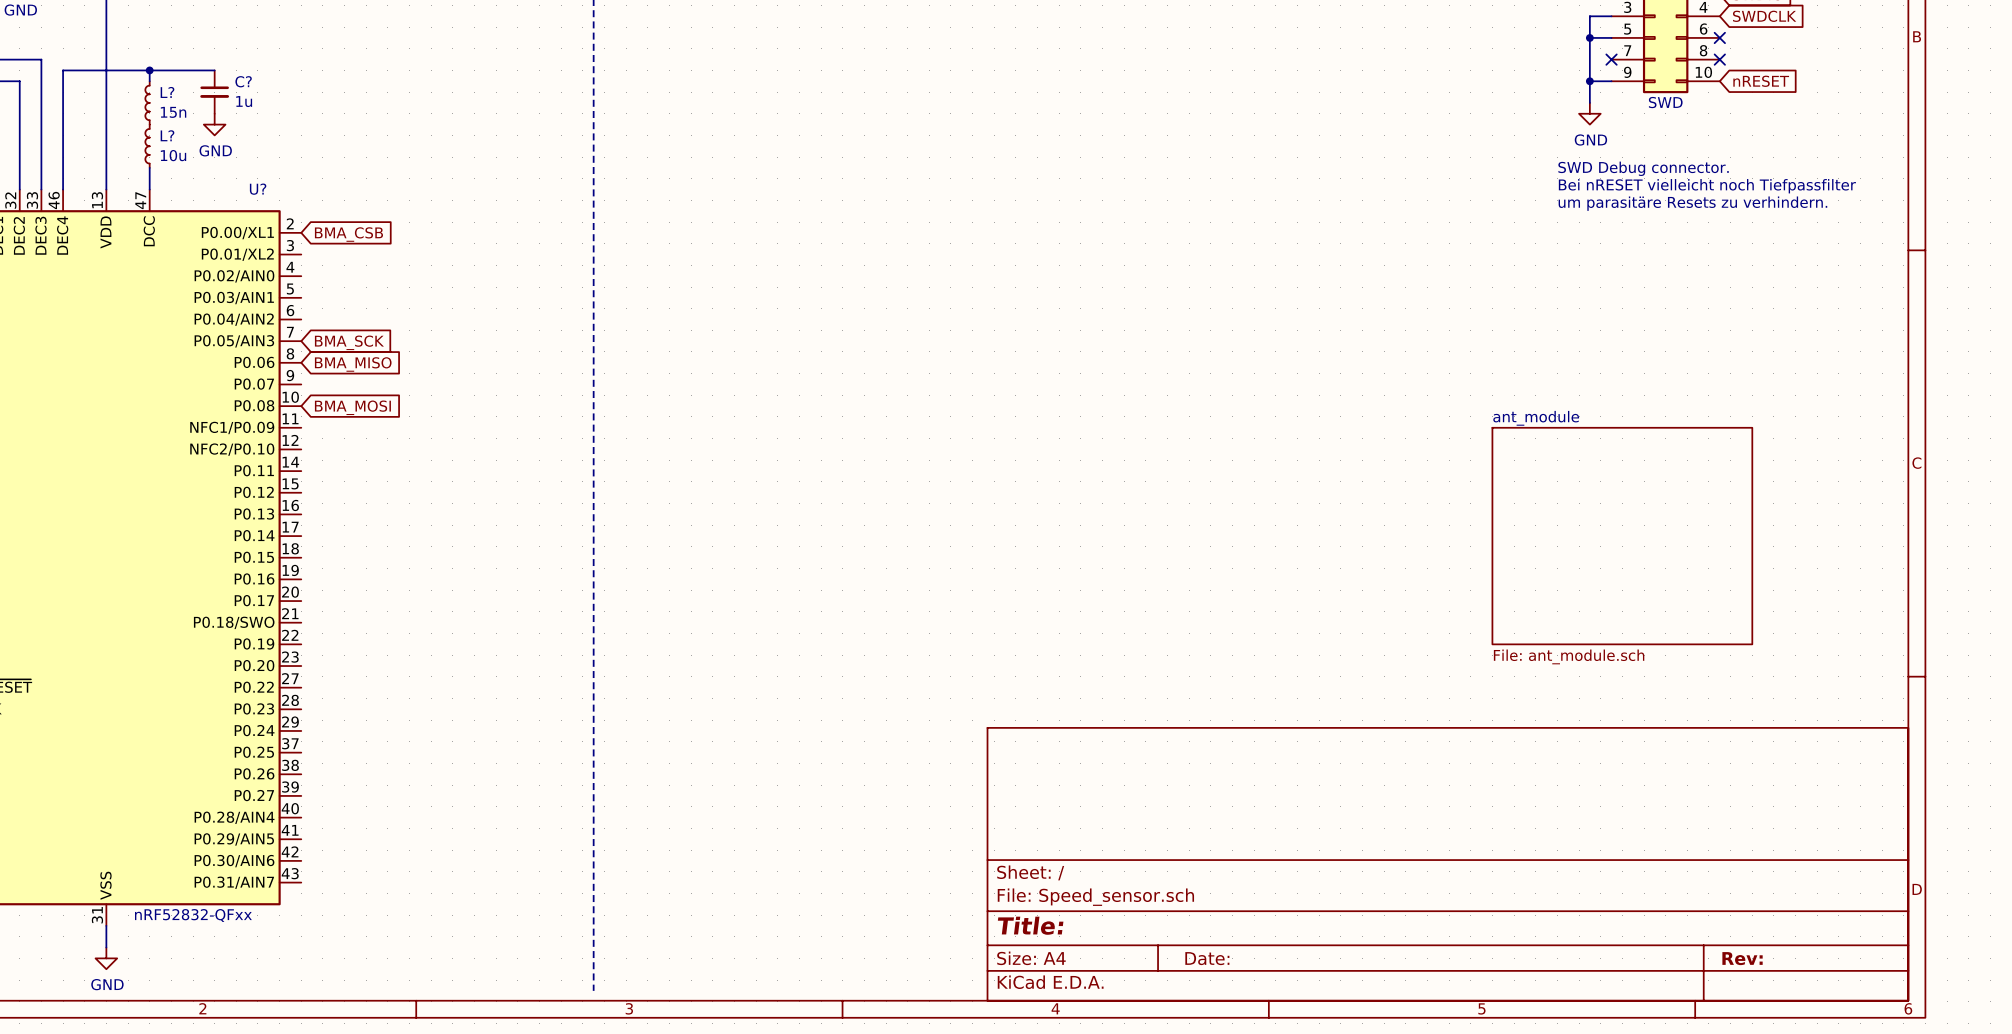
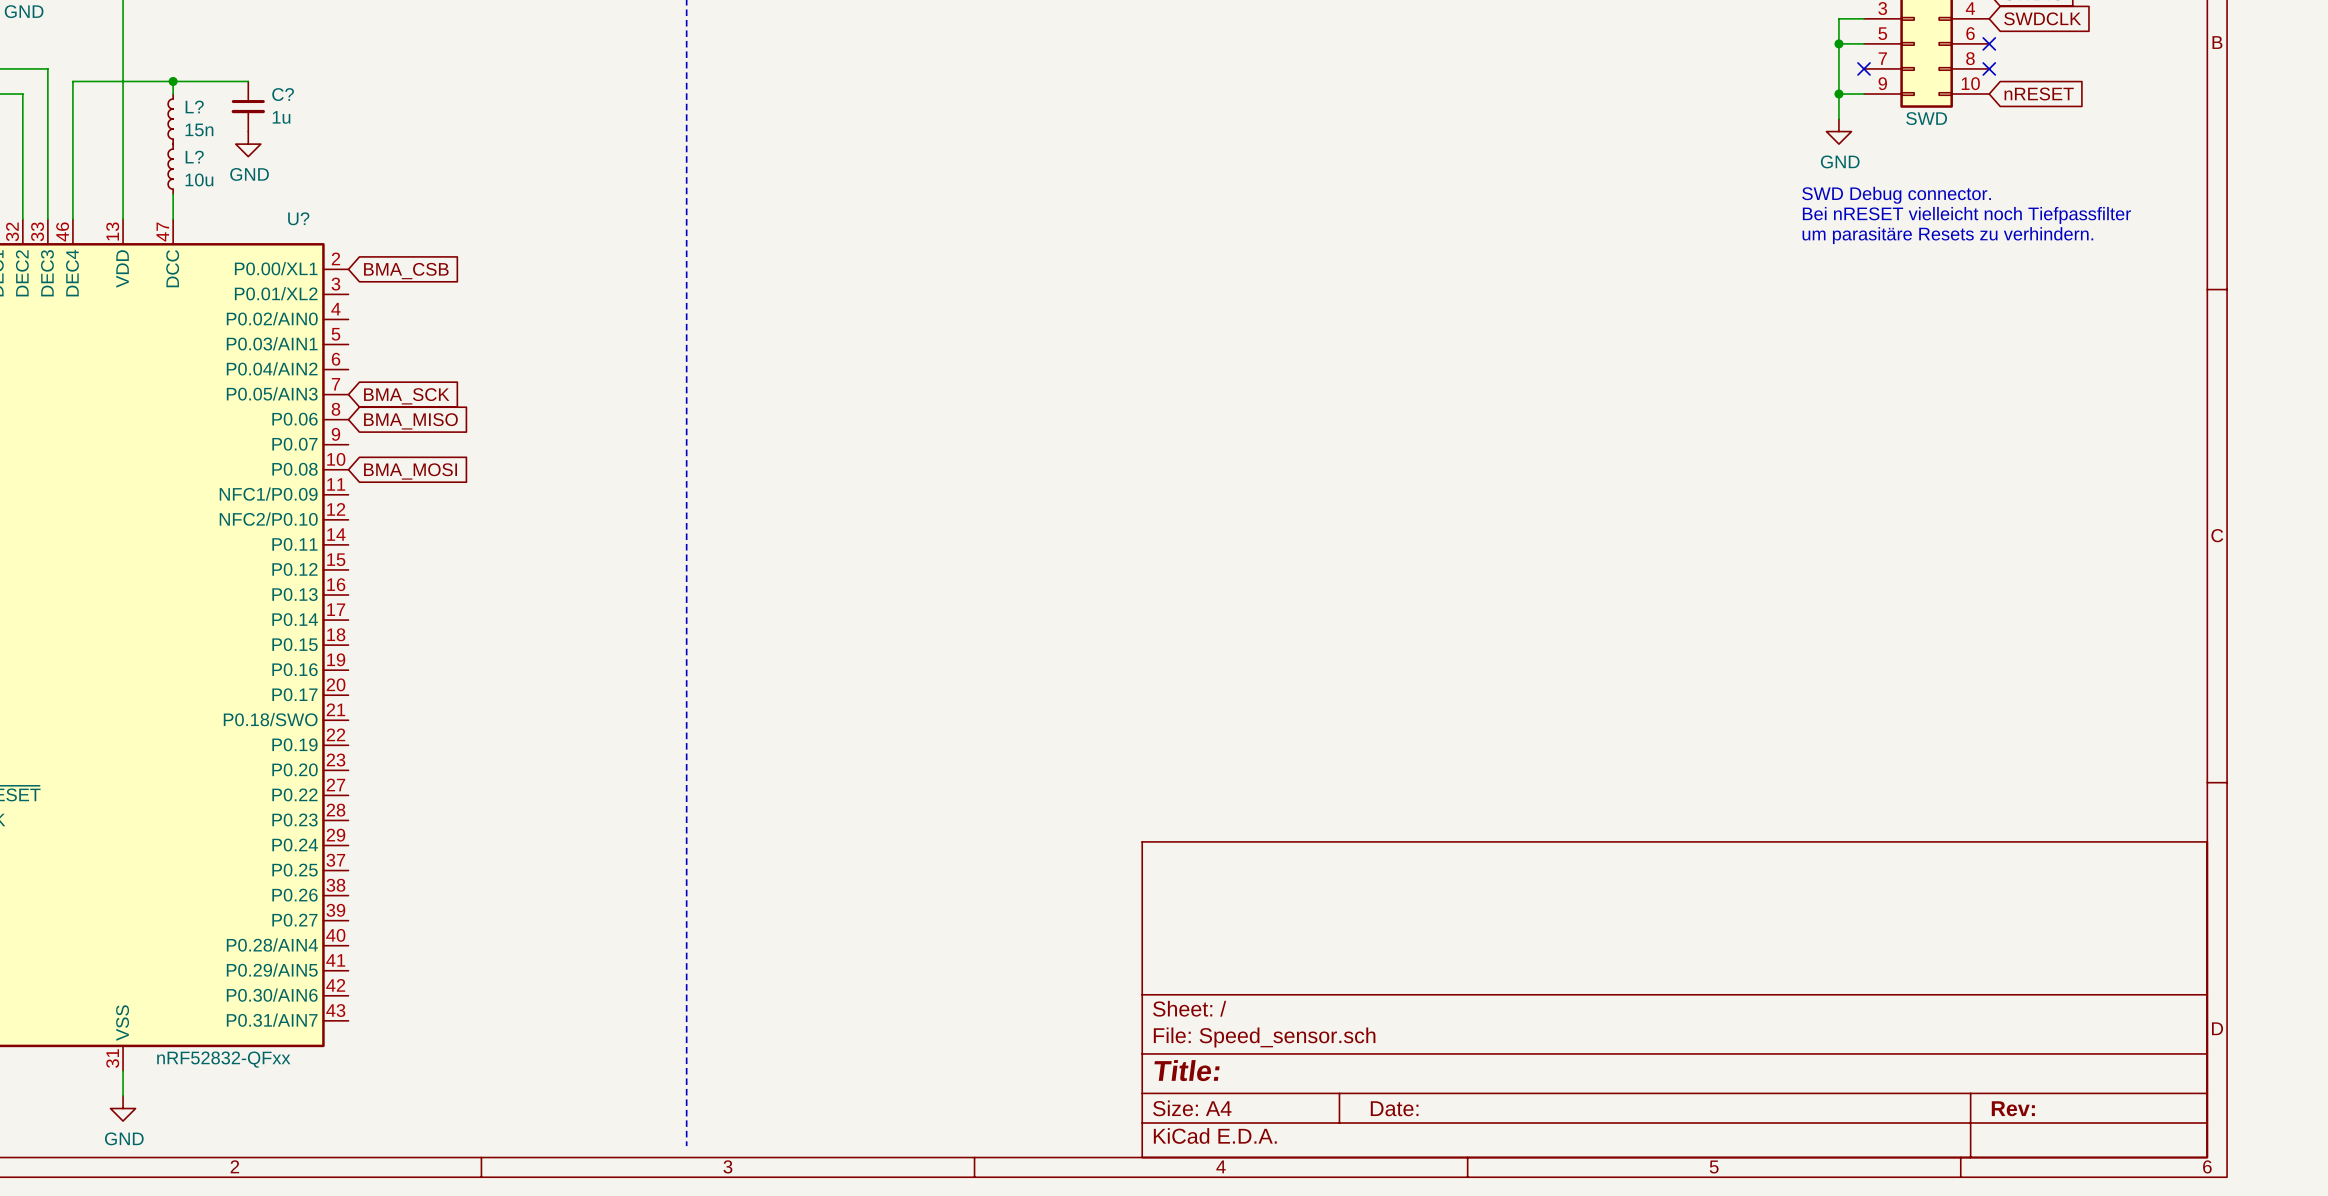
sheet ant_module: File: ant_module.sch (1622, 536) -> none

